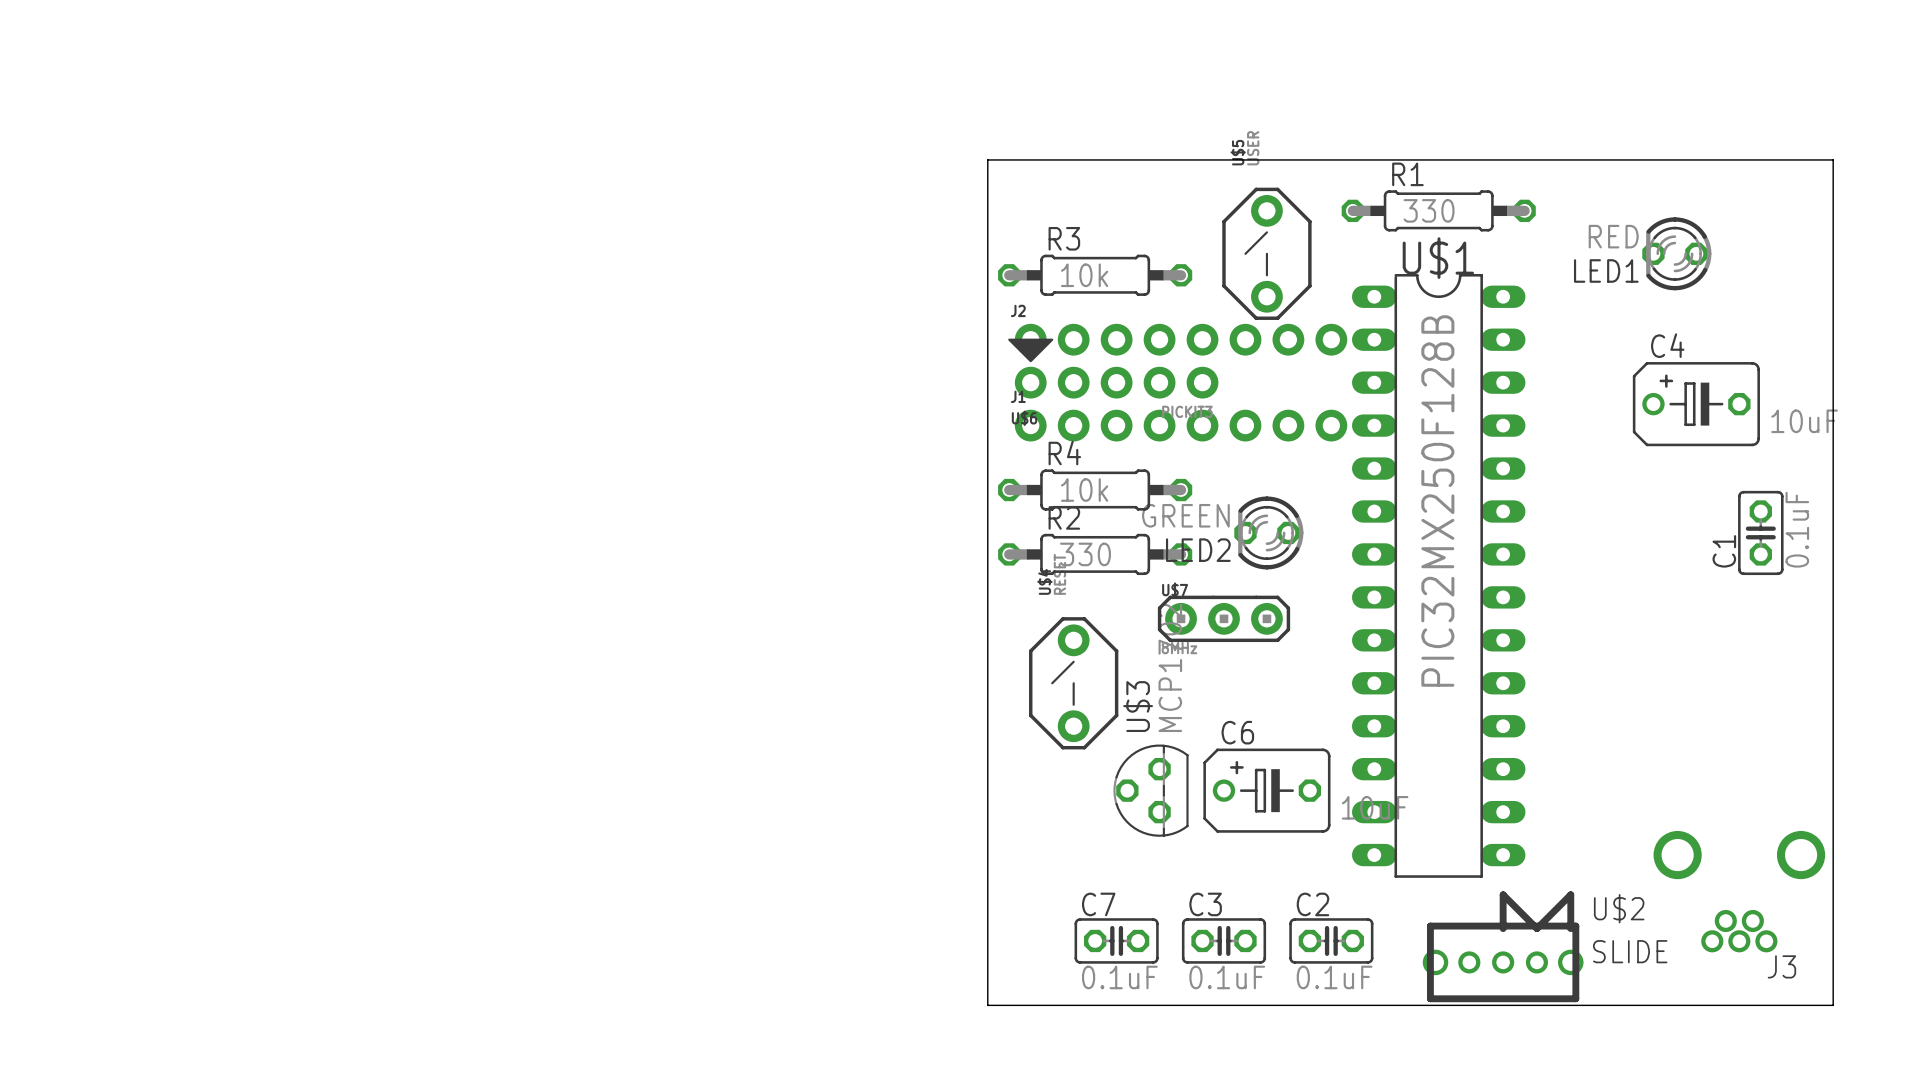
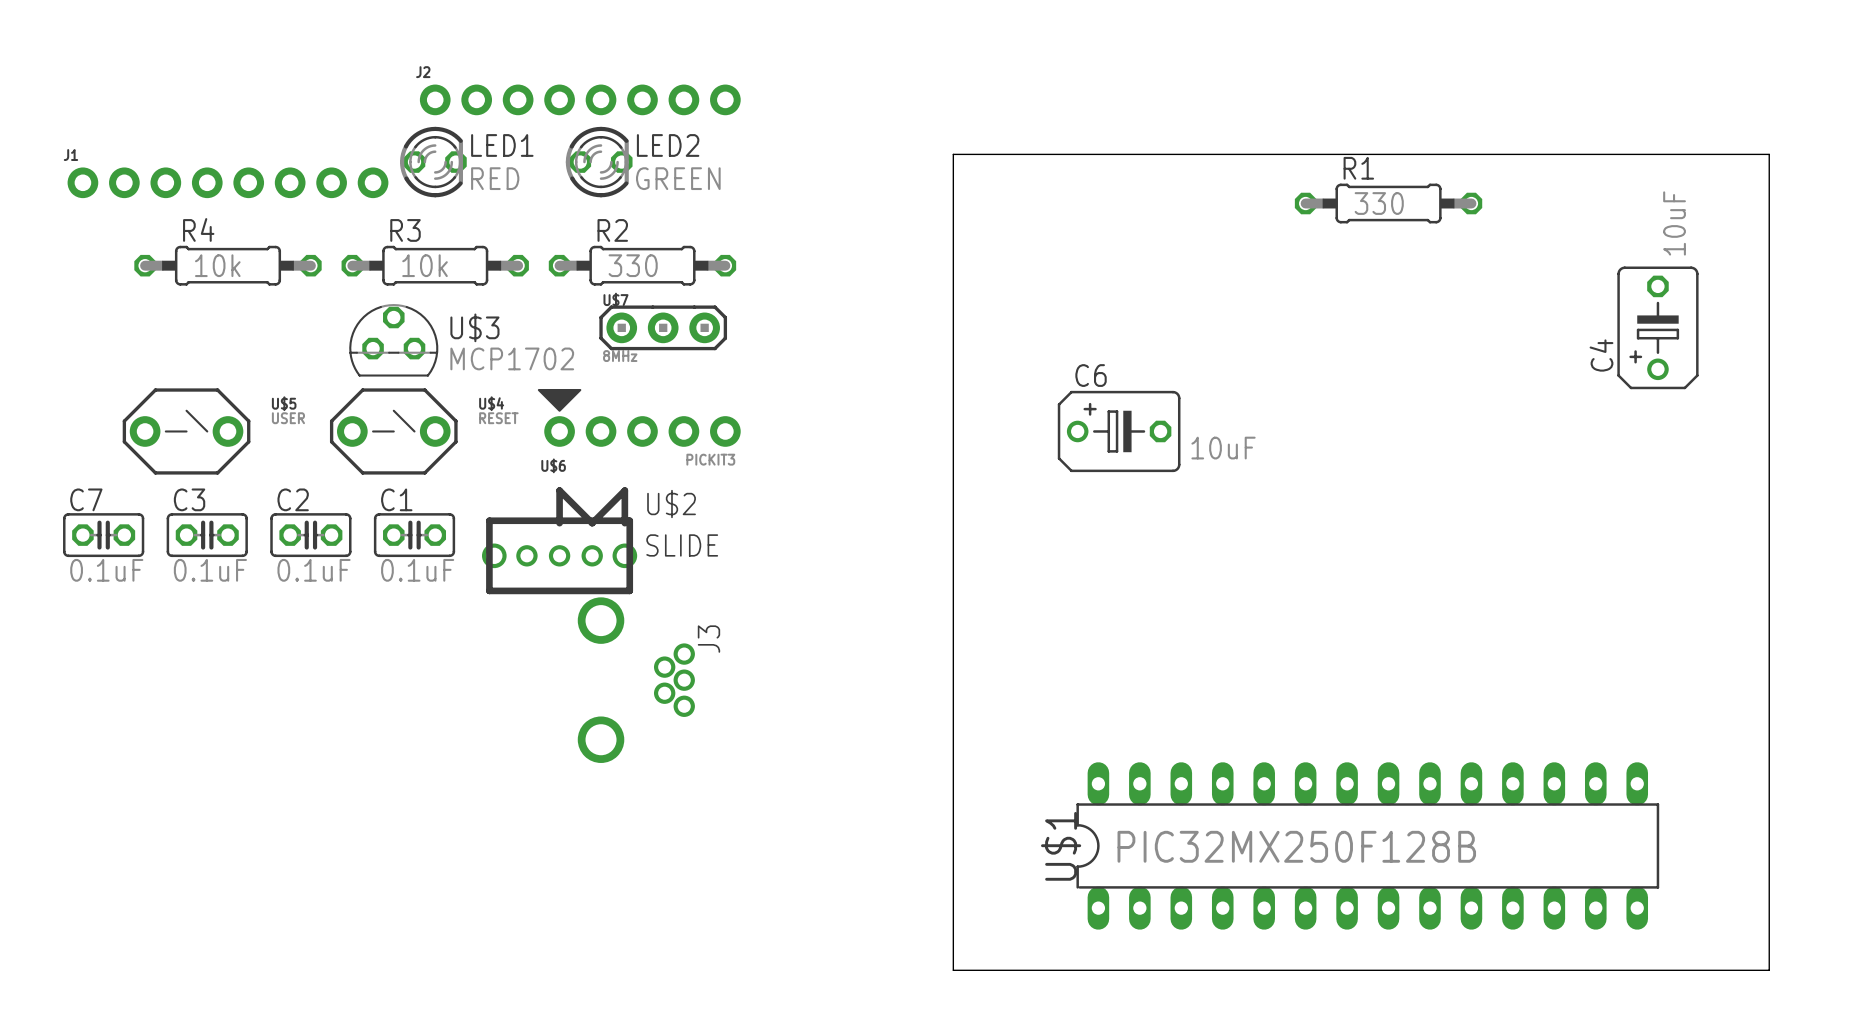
U$5 rotation: 0° (1266, 253) -> 90° clockwise (186, 431)
U$5 position: (1266, 253) -> (186, 431)
LED1 rotation: 0° (1676, 253) -> 180° (433, 162)
LED1 position: (1676, 253) -> (433, 162)
R3 position: (1095, 275) -> (435, 265)
J2 position: (1181, 339) -> (580, 99)
U$6 position: (1113, 368) -> (639, 417)
C4 rotation: 0° (1696, 404) -> 90° counterclockwise (1657, 327)
J1 position: (1181, 425) -> (227, 182)
R4 position: (1095, 490) -> (227, 265)
LED2 rotation: 0° (1268, 532) -> 180° (599, 162)
LED2 position: (1268, 532) -> (599, 162)
C1 rotation: 0° (1760, 532) -> 90° clockwise (414, 535)
C1 position: (1760, 532) -> (414, 535)
R2 position: (1095, 554) -> (642, 265)
U$1 rotation: 0° (1438, 575) -> 90° counterclockwise (1367, 845)
U$7 position: (1223, 618) -> (663, 327)
U$4 rotation: 0° (1073, 683) -> 90° clockwise (393, 431)
U$4 position: (1073, 683) -> (393, 431)
U$3 rotation: 0° (1150, 790) -> 90° clockwise (393, 340)
U$3 position: (1150, 790) -> (393, 340)
C6 position: (1266, 790) -> (1119, 431)
J3 rotation: 0° (1739, 891) -> 90° counterclockwise (636, 680)
J3 position: (1739, 891) -> (636, 680)
C7 position: (1116, 940) -> (103, 535)
C3 position: (1223, 940) -> (207, 535)
C2 position: (1331, 940) -> (310, 535)
U$2 position: (1503, 946) -> (559, 540)

